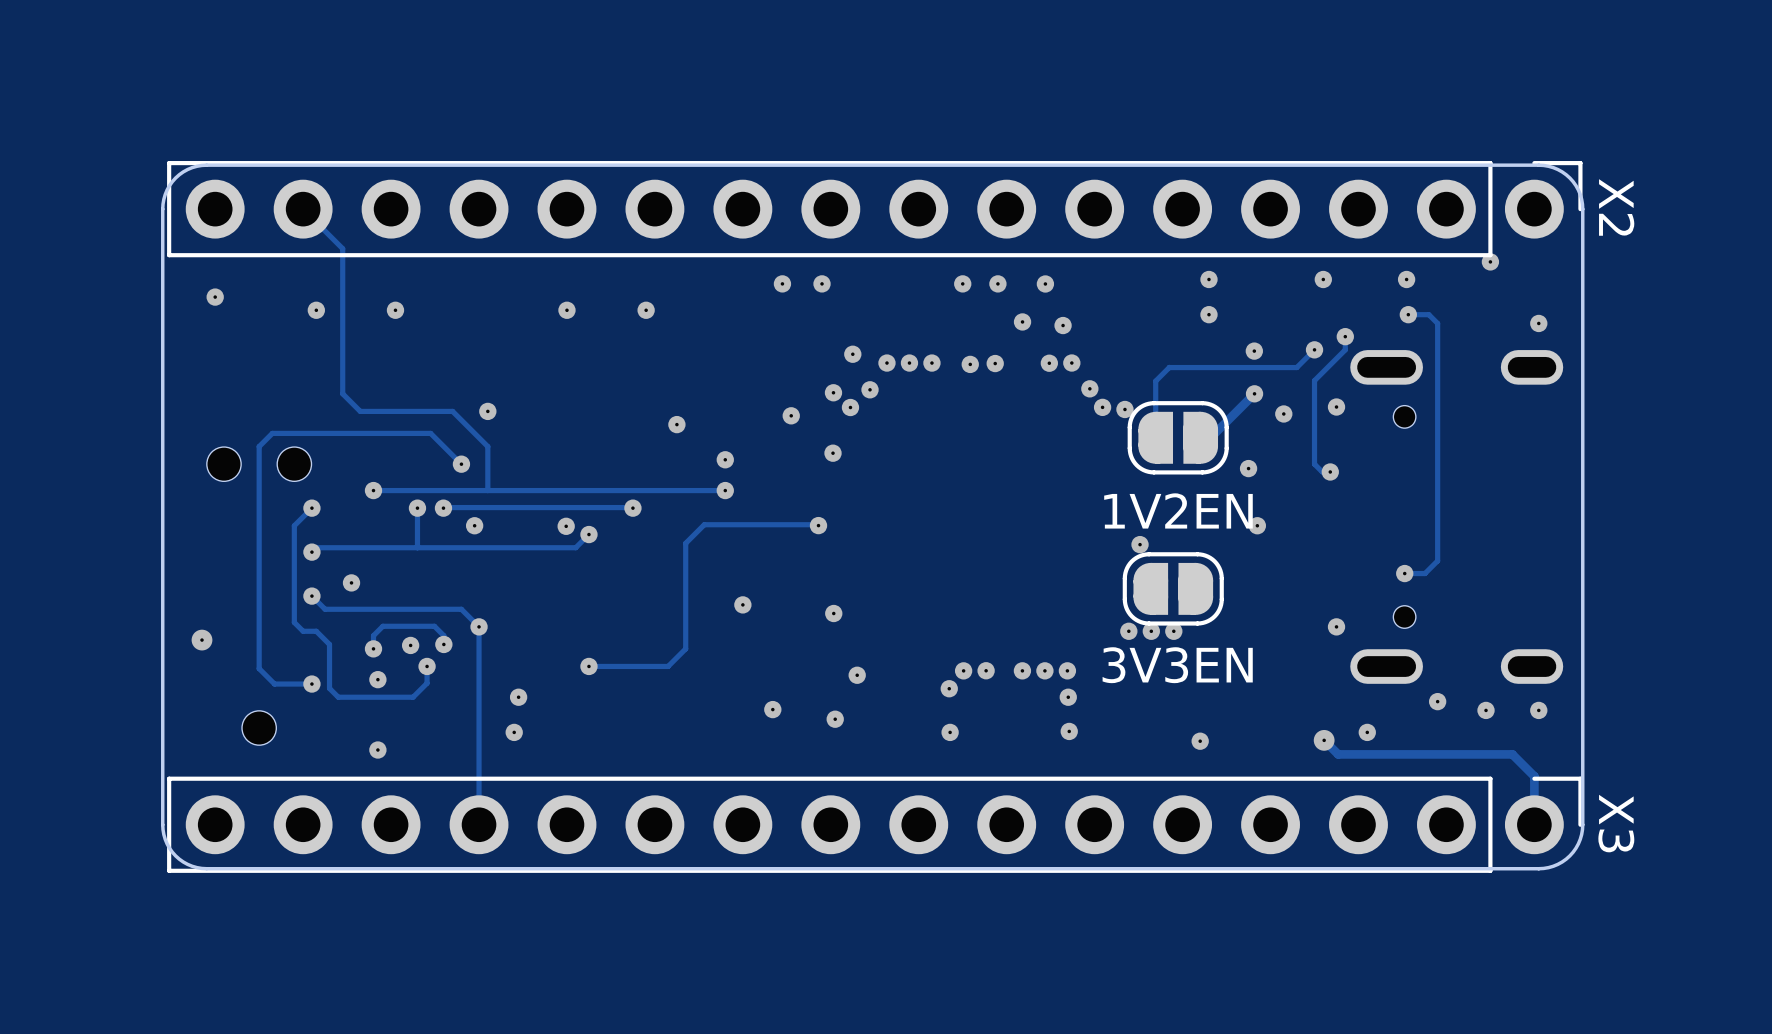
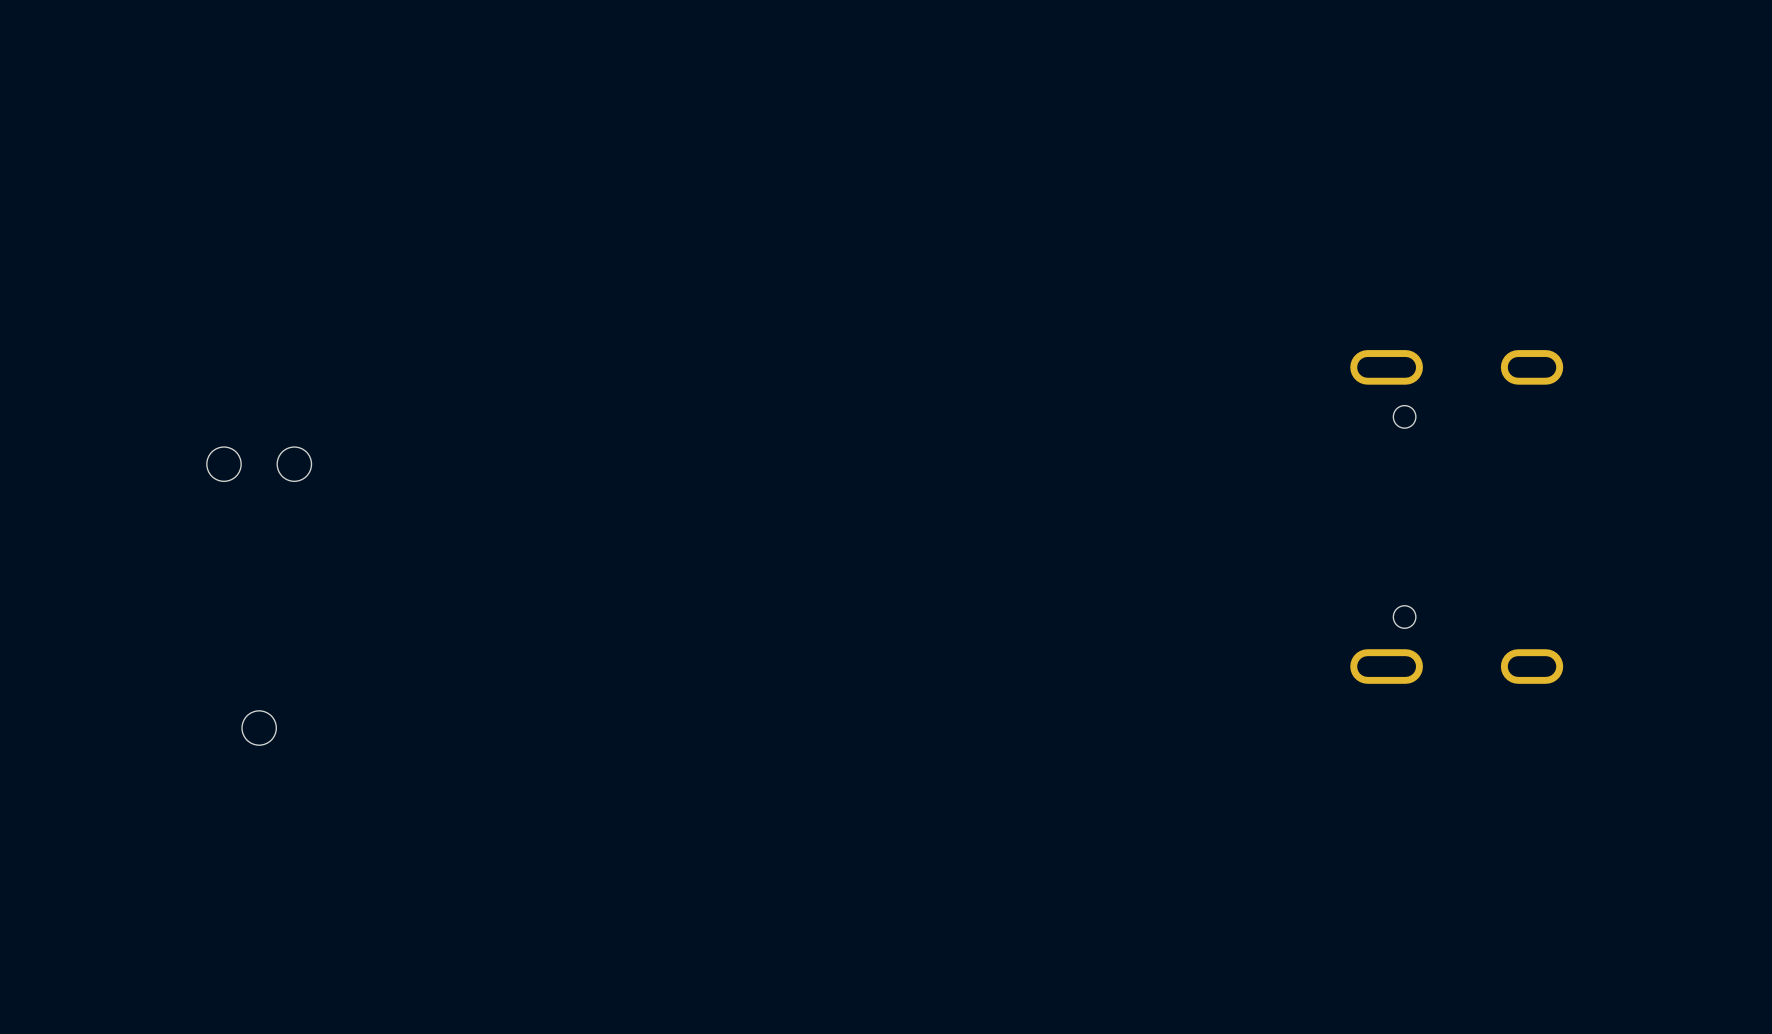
board edge: (1538, 165) (206, 165) (187, 169) (175, 178) (169, 185) (165, 194) (162, 209) (162, 824) (167, 843) (175, 855) (183, 861) (196, 867) (206, 868) (1538, 868) (1557, 864) (1569, 855) (1576, 848) (1580, 839) (1582, 824) (1582, 209) (1578, 190) (1569, 178) (1557, 169) (1538, 165) -> none
track: (303, 209) (342, 248) (342, 393) (360, 411) (452, 411) (487, 446) (487, 490) -> none
X2: (874, 209) -> none
via: (1490, 261) -> none
via: (1208, 279) -> none
via: (1323, 279) -> none
via: (1406, 279) -> none
via: (782, 283) -> none
via: (822, 283) -> none
via: (962, 283) -> none
via: (997, 283) -> none
via: (1045, 283) -> none
via: (215, 297) -> none
via: (316, 310) -> none
via: (395, 310) -> none
via: (566, 310) -> none
via: (646, 310) -> none
via: (1208, 314) -> none
via: (1408, 314) -> none
track: (1408, 316) (1428, 314) (1437, 323) (1437, 560) (1425, 573) (1404, 573) -> none
via: (1022, 321) -> none
via: (1538, 323) -> none
via: (1063, 325) -> none
track: (1345, 336) (1345, 349) (1314, 380) (1314, 464) (1322, 471) (1330, 471) -> none
via: (1345, 336) -> none
track: (1314, 349) (1296, 367) (1169, 367) -> none
via: (1314, 349) -> none
via: (1254, 351) -> none
via: (852, 354) -> none
via: (886, 363) -> none
via: (909, 363) -> none
via: (931, 363) -> none
via: (995, 363) -> none
via: (1049, 363) -> none
via: (1071, 363) -> none
via: (970, 364) -> none
track: (1169, 367) (1155, 381) (1155, 437) -> none
via: (1089, 388) -> none
via: (870, 389) -> none
via: (833, 392) -> none
track: (1254, 393) (1210, 437) (1200, 437) -> none
via: (1254, 393) -> none
via: (850, 407) -> none
via: (1102, 407) -> none
via: (1336, 407) -> none
via: (1124, 409) -> none
via: (487, 411) -> none
via: (1283, 413) -> none
via: (791, 415) -> none
via: (676, 424) -> none
part: 1V2EN (1178, 437) -> none
via: (833, 453) -> none
via: (725, 459) -> none
track: (461, 464) (430, 433) (272, 433) (259, 446) (259, 668) (274, 684) (311, 684) -> none
via: (461, 464) -> none
via: (1248, 468) -> none
via: (1330, 471) -> none
track: (376, 487) (373, 490) (725, 490) -> none
via: (373, 490) -> none
via: (725, 490) -> none
track: (311, 508) (294, 525) (294, 622) (303, 631) (316, 631) (329, 644) (329, 688) (338, 697) (413, 697) (427, 683) (427, 666) -> none
via: (311, 508) -> none
track: (417, 508) (417, 547) -> none
via: (417, 508) -> none
via: (443, 508) -> none
track: (632, 508) (443, 508) -> none
via: (632, 508) -> none
via: (474, 525) -> none
track: (818, 525) (704, 524) (685, 543) (685, 648) (668, 666) (588, 666) -> none
via: (818, 525) -> none
via: (1257, 525) -> none
via: (566, 526) -> none
track: (588, 534) (575, 547) (316, 547) (311, 552) -> none
via: (588, 534) -> none
via: (1140, 544) -> none
via: (311, 552) -> none
via: (1404, 573) -> none
via: (351, 582) -> none
part: 3V3EN (1173, 588) -> none
track: (311, 596) (325, 609) (461, 609) (479, 626) (479, 824) -> none
via: (311, 596) -> none
via: (742, 604) -> none
via: (833, 613) -> none
via: (479, 626) -> none
via: (1336, 626) -> none
via: (1128, 631) -> none
via: (1151, 631) -> none
via: (1173, 631) -> none
via: (202, 640) -> none
track: (443, 644) (443, 635) (434, 626) (382, 626) (373, 635) (373, 648) -> none
via: (443, 644) -> none
via: (410, 645) -> none
via: (373, 648) -> none
via: (427, 666) -> none
via: (588, 666) -> none
via: (963, 670) -> none
via: (986, 670) -> none
via: (1022, 670) -> none
via: (1044, 670) -> none
via: (1067, 670) -> none
via: (857, 675) -> none
via: (377, 679) -> none
via: (311, 684) -> none
via: (949, 688) -> none
via: (518, 697) -> none
via: (1068, 697) -> none
via: (1437, 701) -> none
via: (772, 709) -> none
via: (1486, 710) -> none
via: (1538, 710) -> none
via: (835, 719) -> none
via: (1069, 731) -> none
via: (514, 732) -> none
via: (950, 732) -> none
via: (1367, 732) -> none
track: (1324, 740) (1338, 754) (1512, 754) (1534, 776) (1534, 824) -> none
via: (1324, 740) -> none
via: (1200, 741) -> none
via: (377, 750) -> none
X3: (874, 824) -> none

